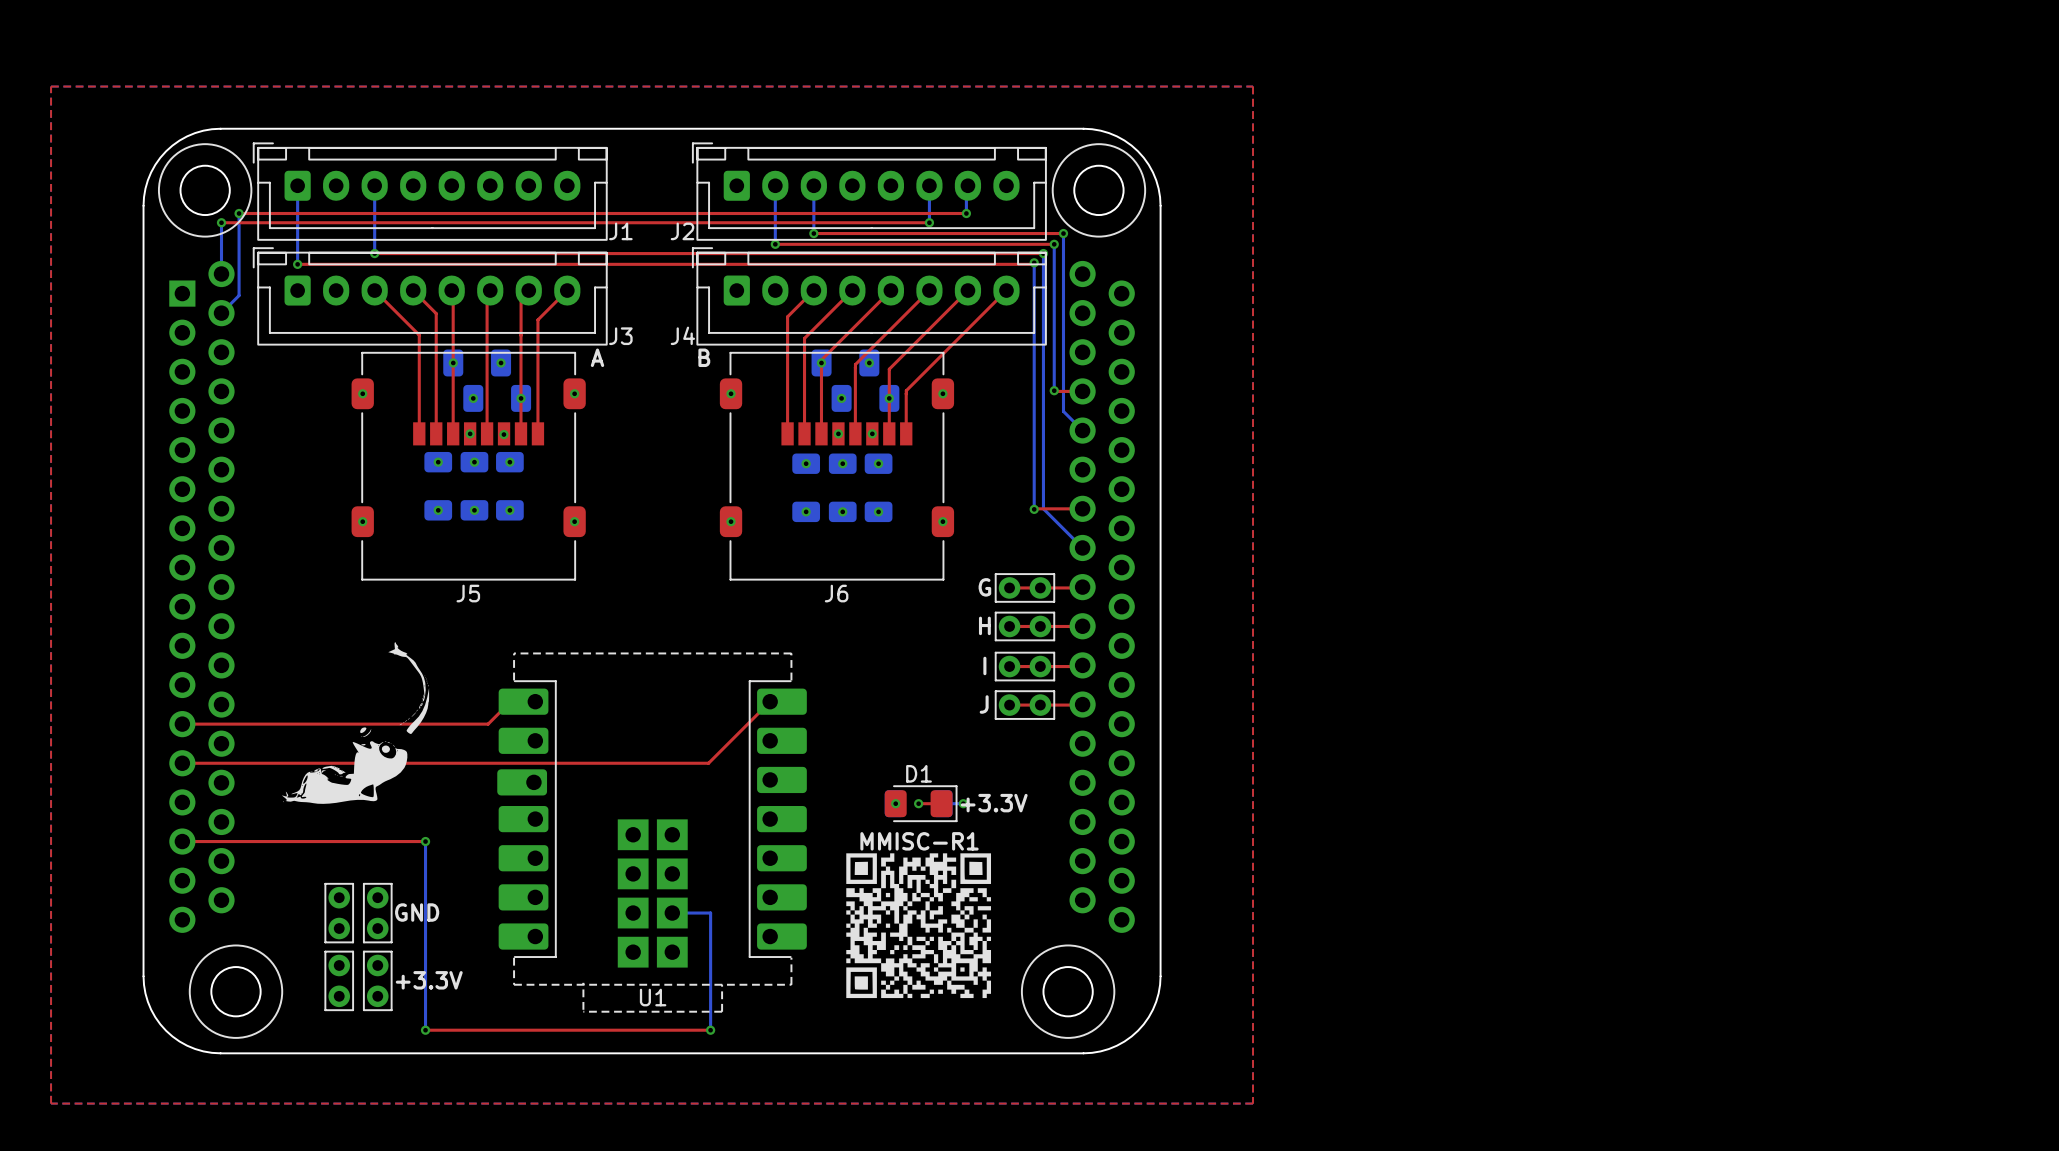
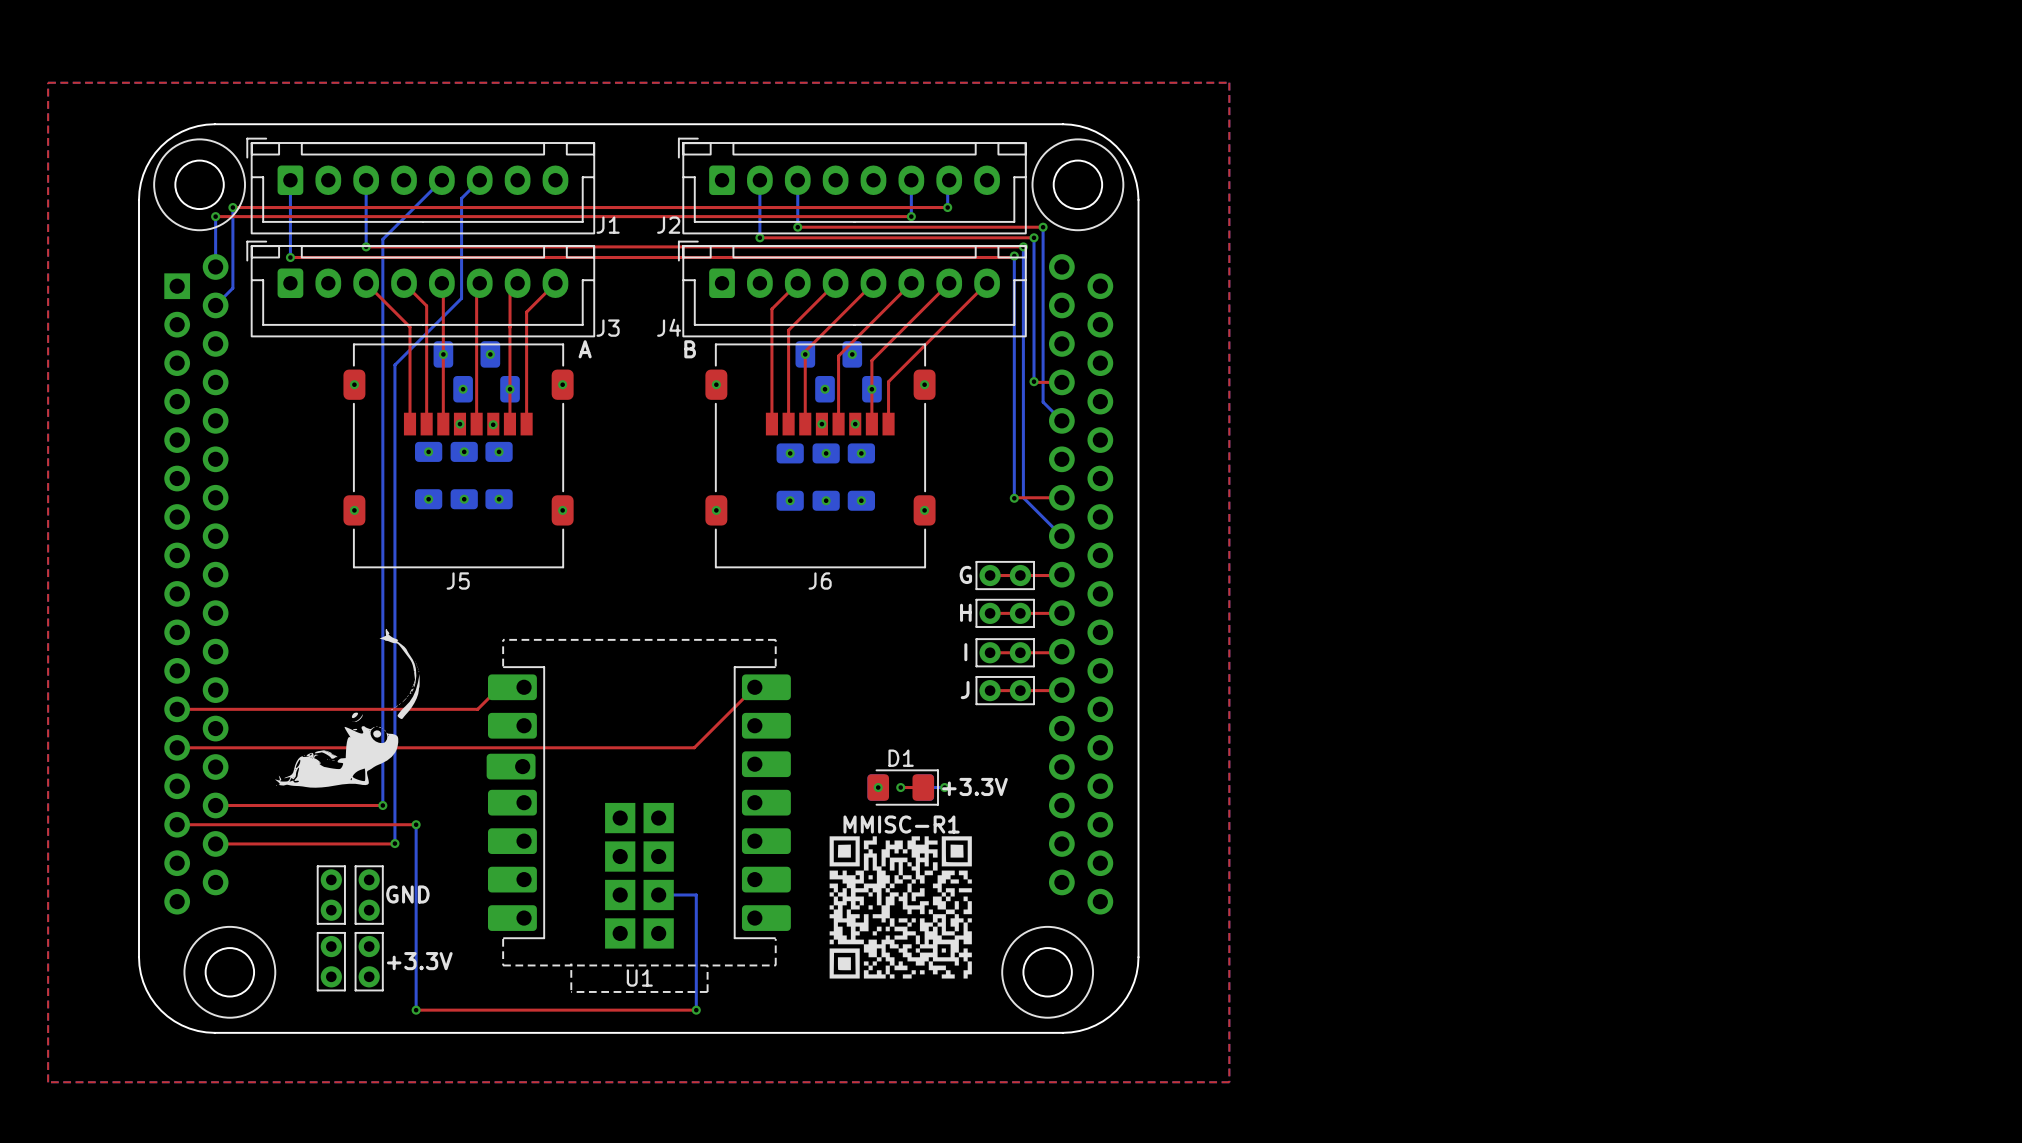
bottom track: none -> (441, 180) (382, 239) (382, 805)
bottom track: none -> (479, 180) (461, 198) (461, 298) (394, 365) (394, 843)
top track: none -> (215, 805) (382, 805)
via: none -> (382, 805)
top track: none -> (394, 843) (215, 843)
via: none -> (394, 843)

